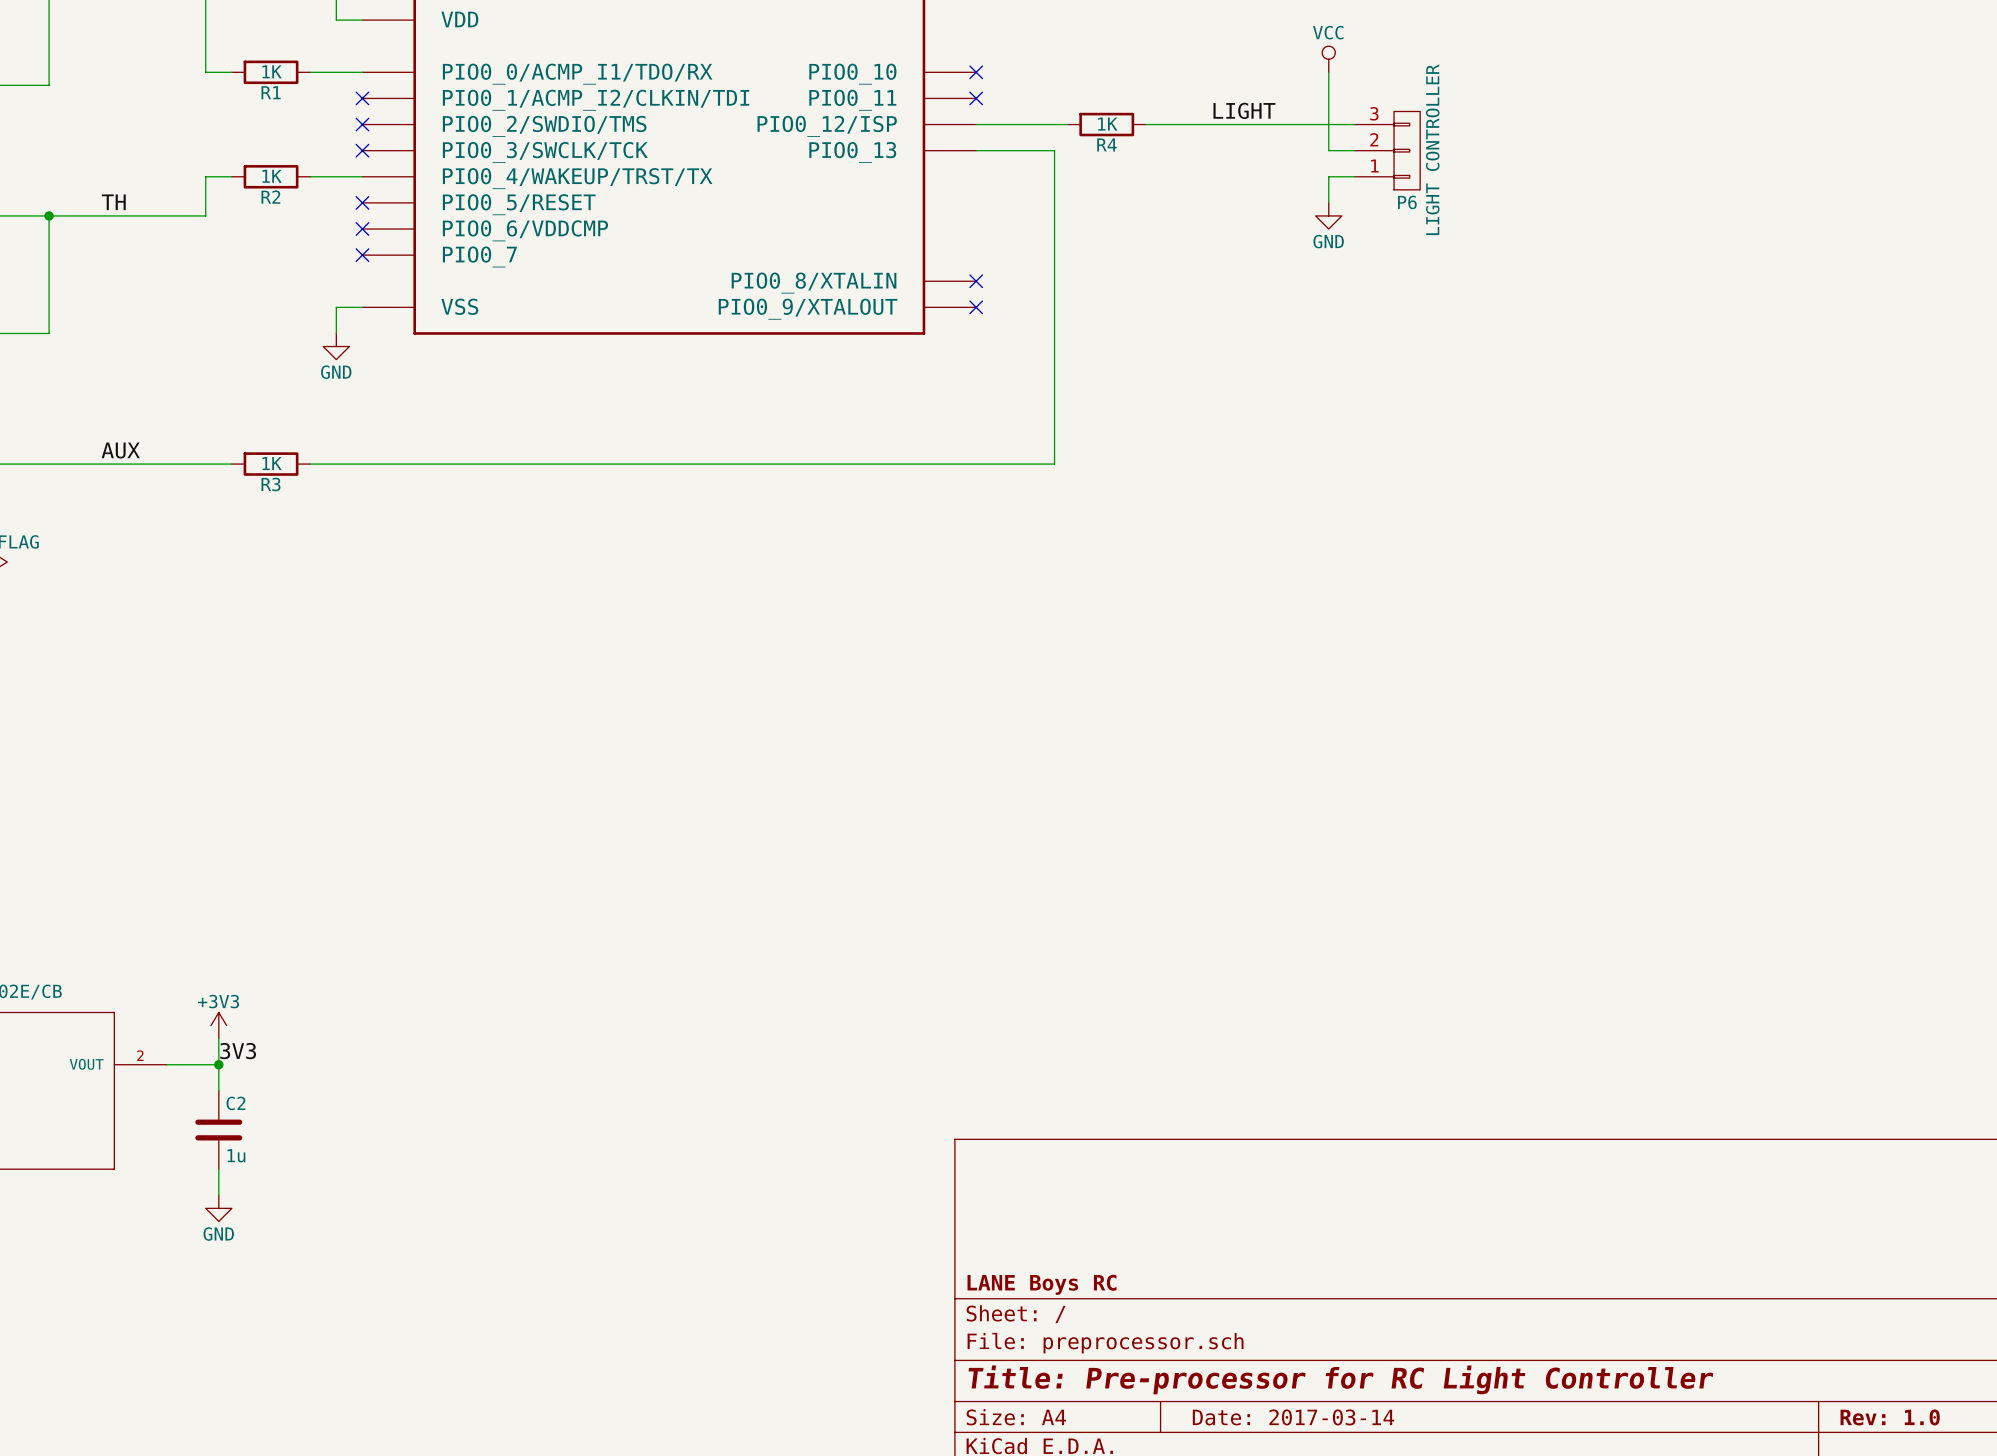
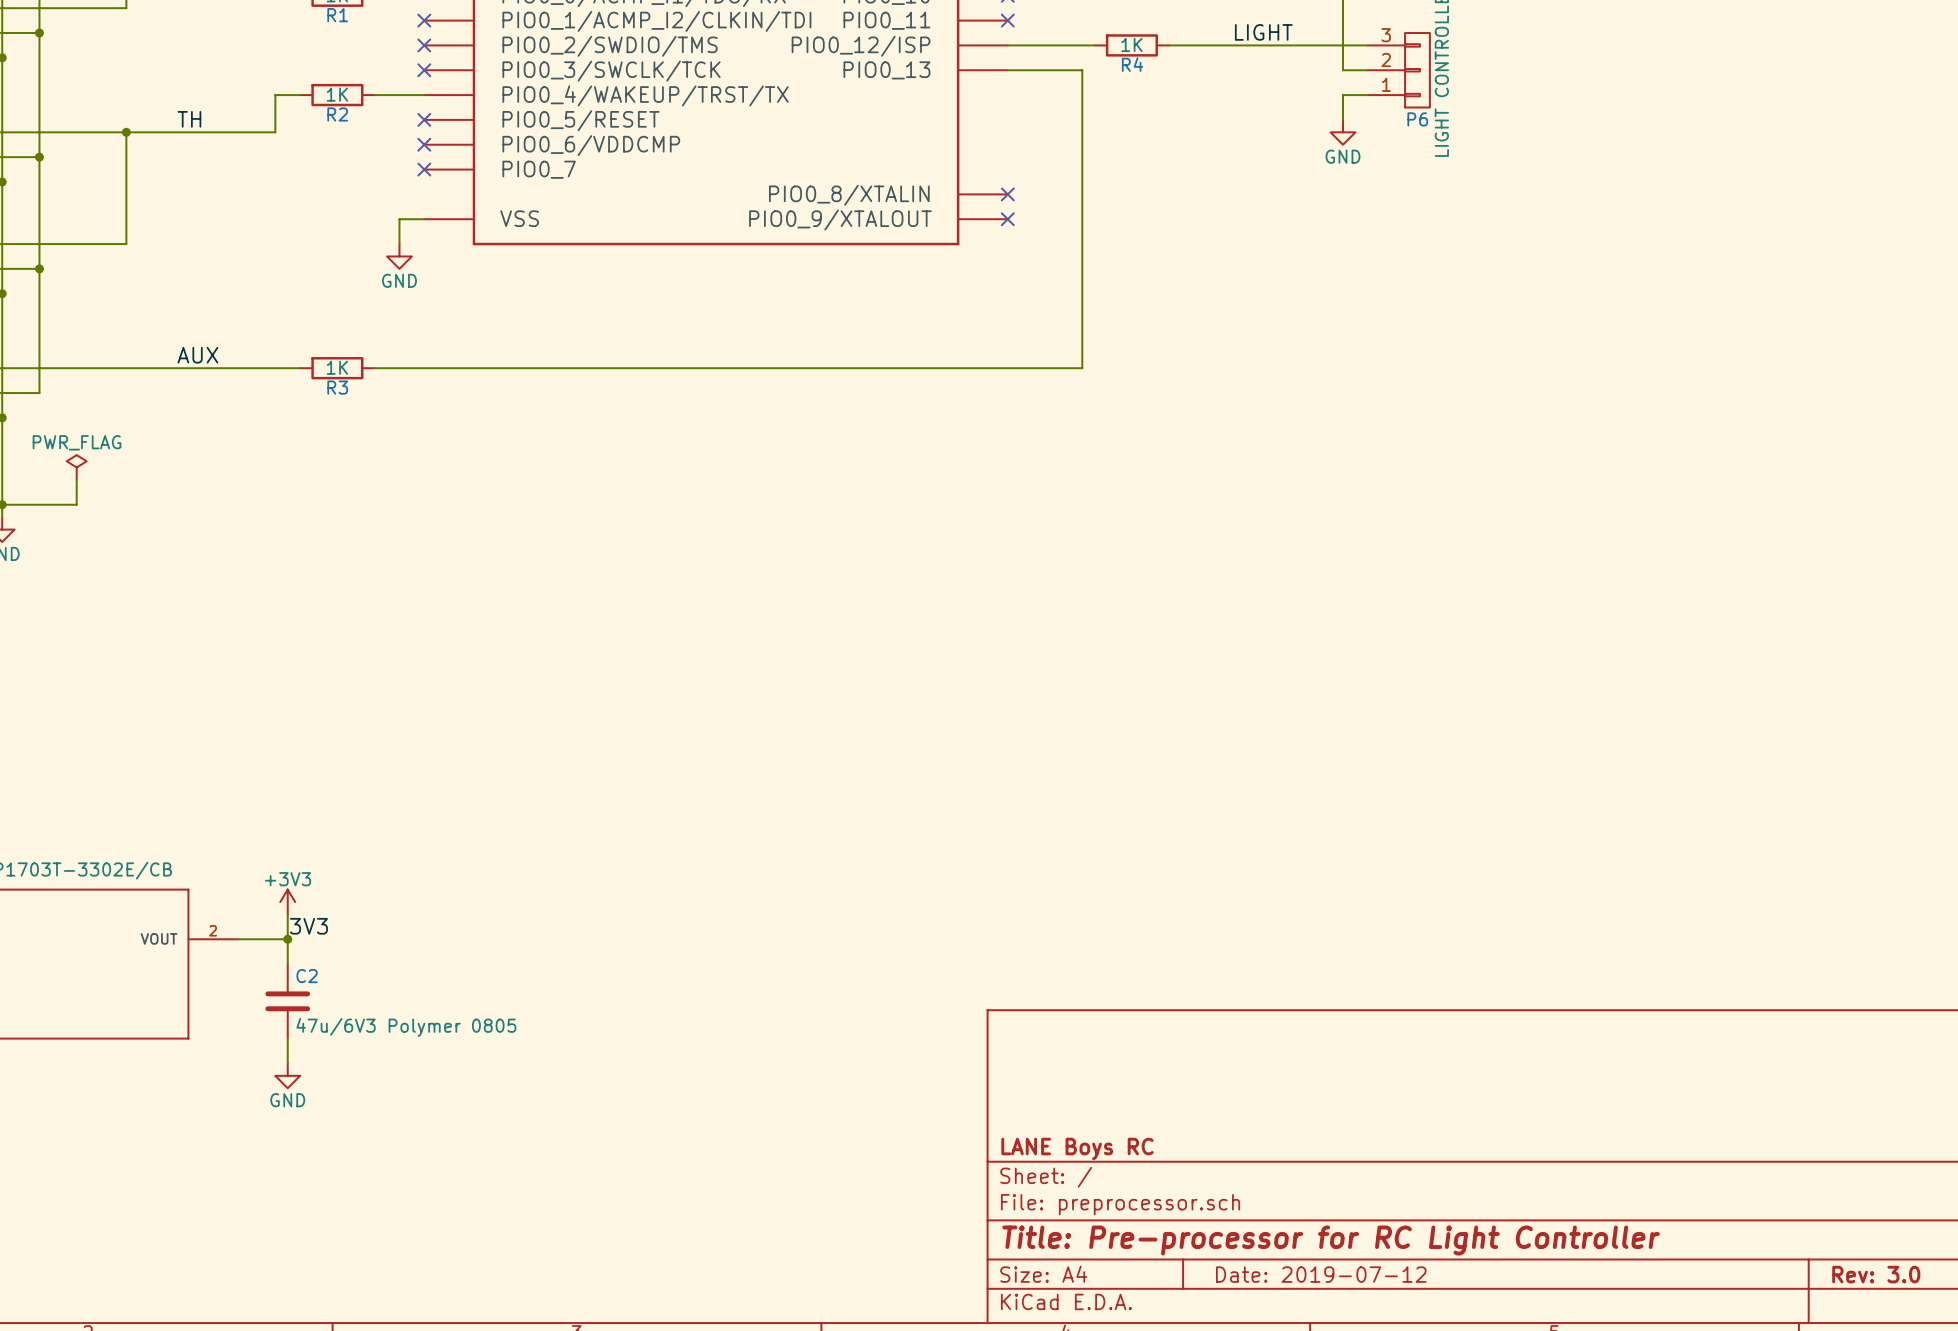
C2 value: 1u (236, 1155) -> 47u/6V3 Polymer 0805 (406, 1027)
title block: Date: 2017-03-14 (1293, 1417) -> Date: 2019-07-12 (1321, 1274)
title block: Rev: 1.0 (1890, 1417) -> Rev: 3.0 (1876, 1274)

